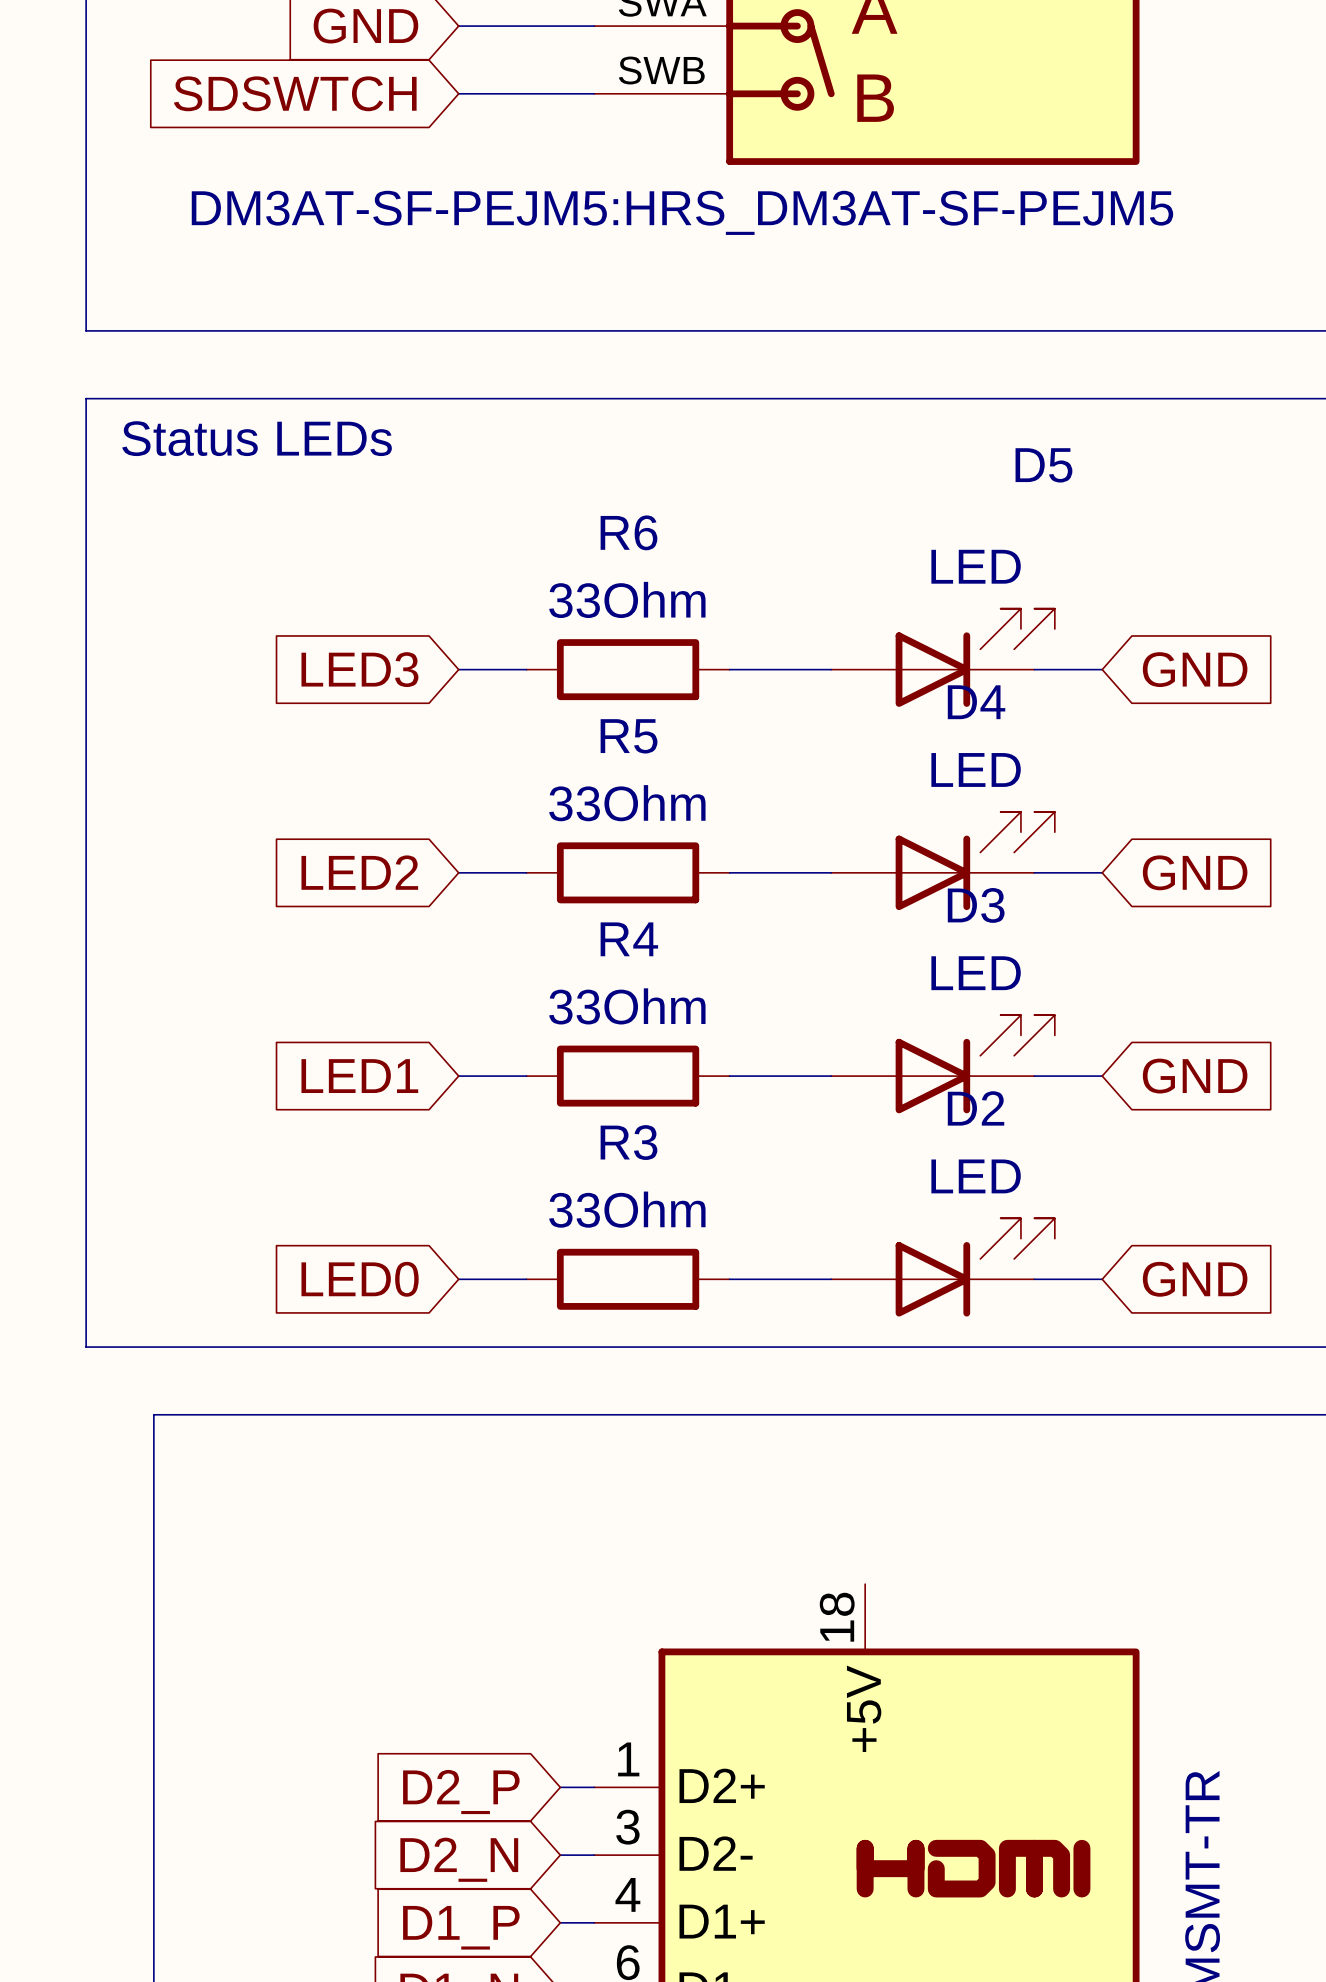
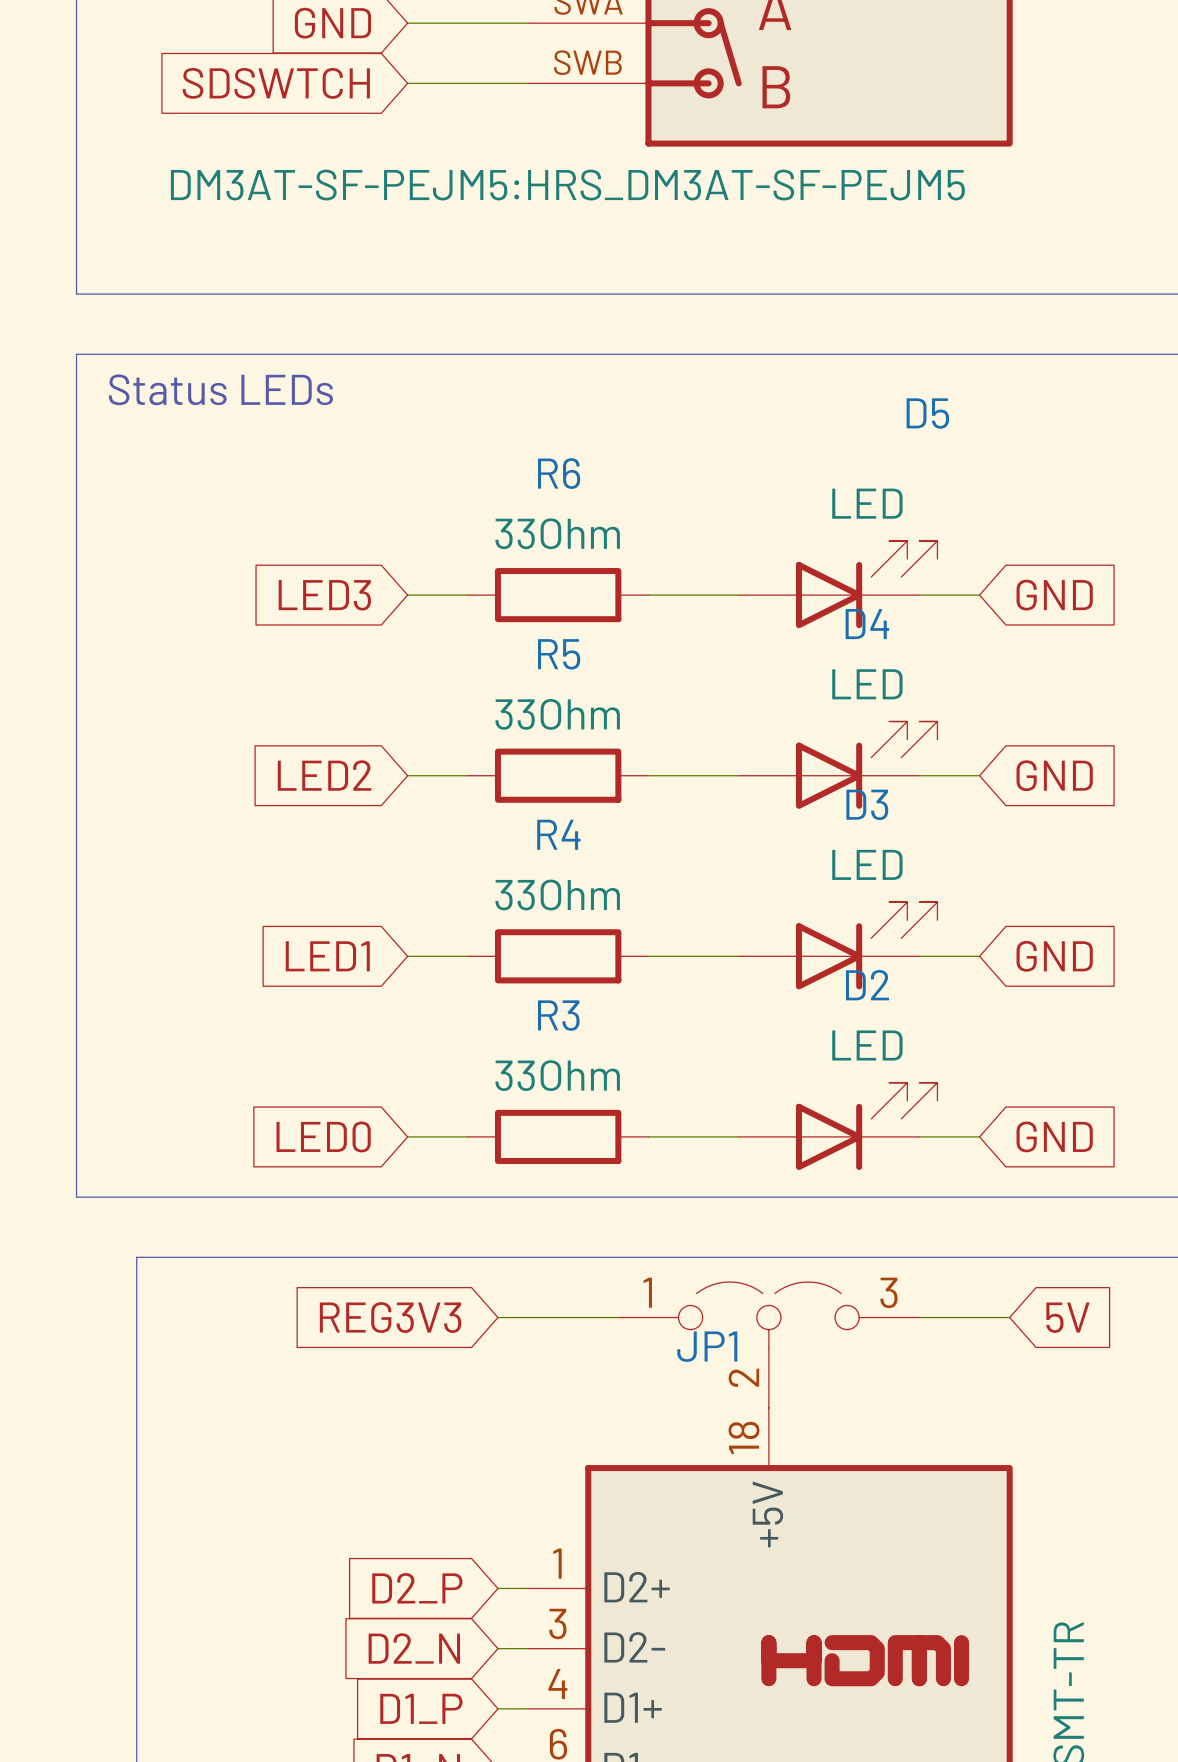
global label: none -> REG3V3 (390, 1317)
wire: none -> (497, 1317) (618, 1317)
wire: none -> (919, 1317) (1009, 1317)
global label: none -> 5V (1067, 1317)
JP1: none -> (768, 1344)

